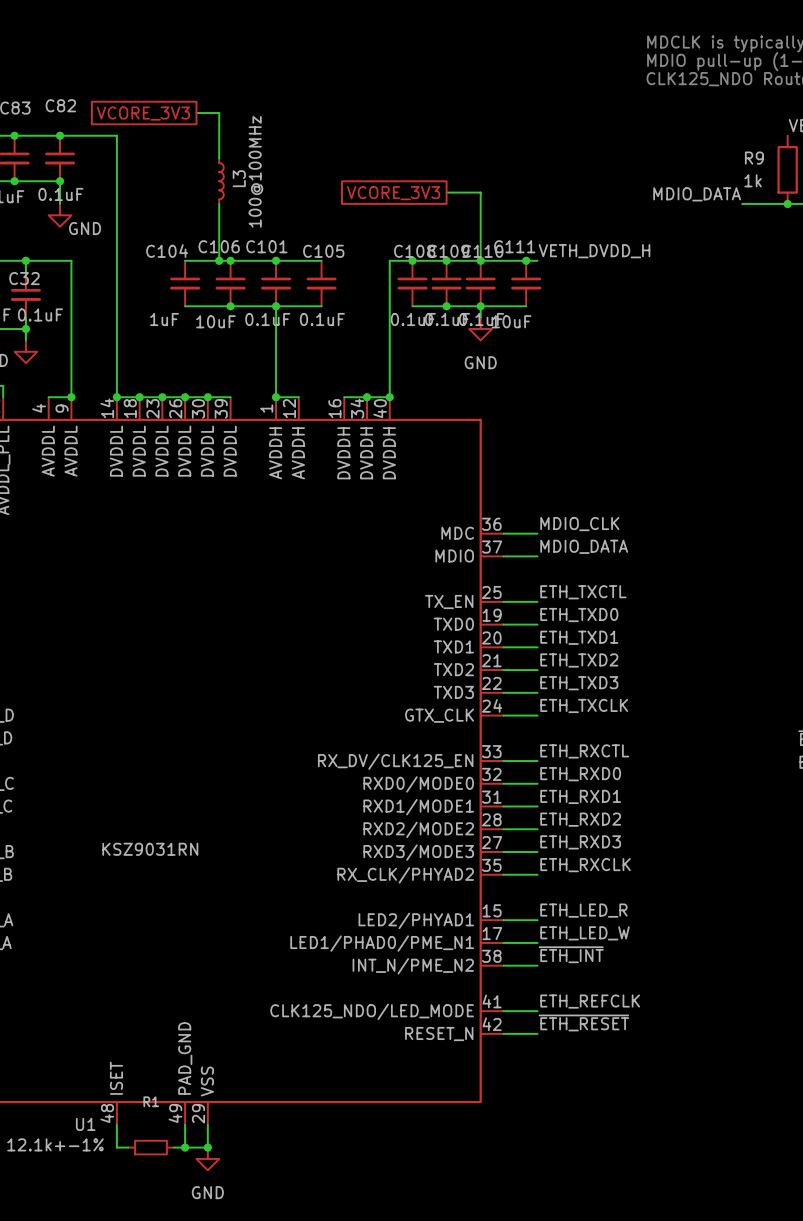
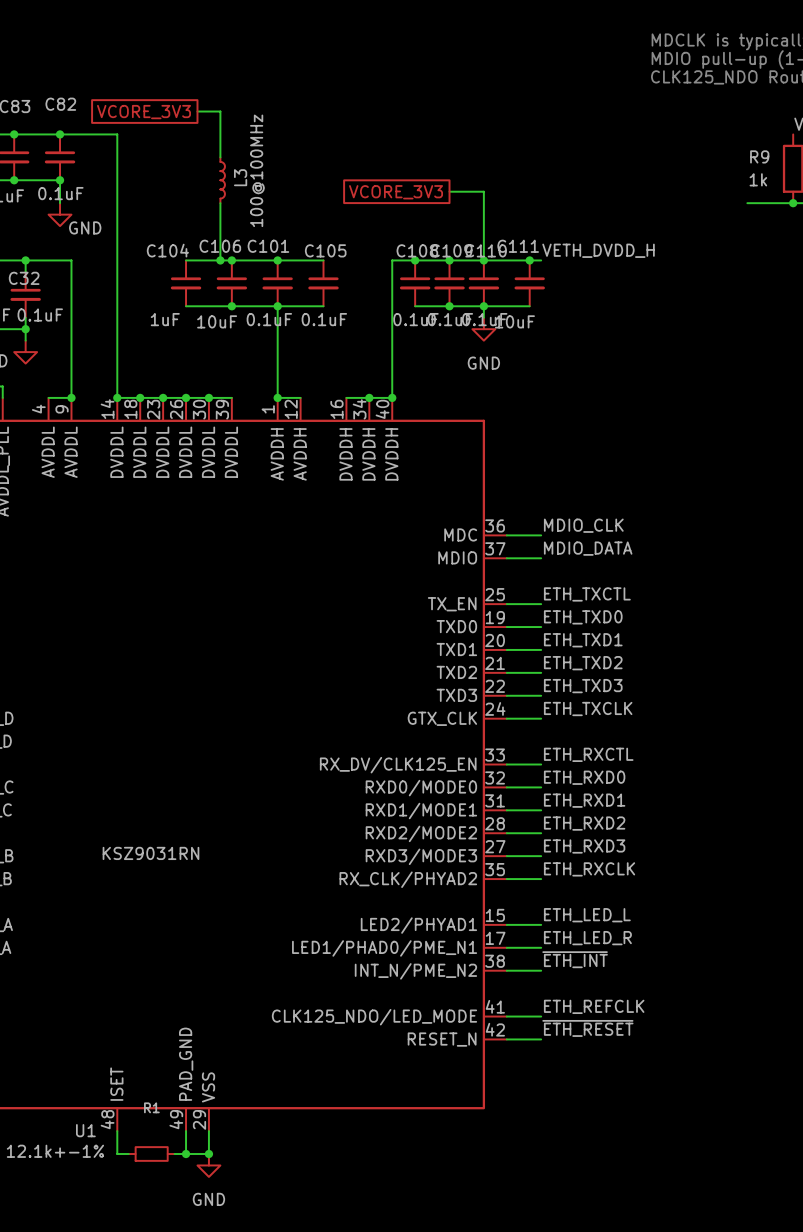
label: MDIO_DATA (697, 194) -> none
label: ETH_LED_R (583, 910) -> ETH_LED_L (587, 915)
label: ETH_LED_W (585, 933) -> ETH_LED_R (587, 938)

